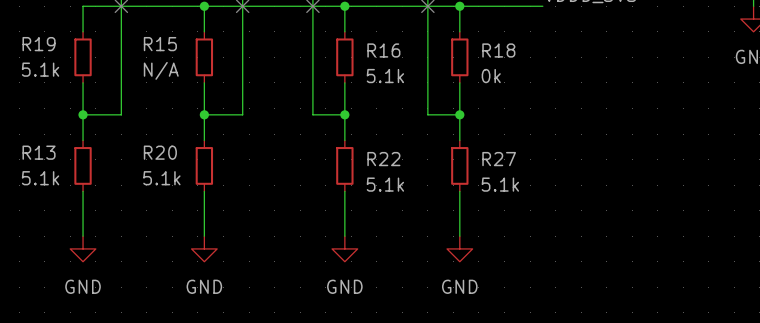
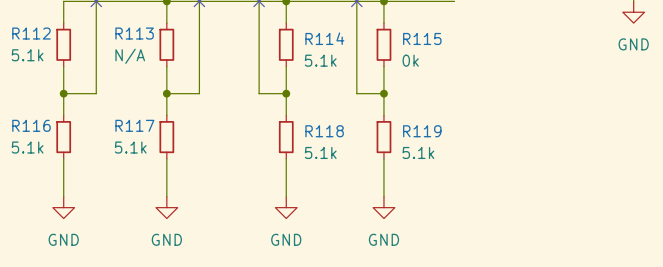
R19 name: R19 (39, 44) -> R112 (31, 33)
R15 name: R15 (160, 44) -> R113 (134, 33)
R16 name: R16 (383, 50) -> R114 (324, 38)
R18 name: R18 (498, 50) -> R115 (422, 38)
R13 name: R13 (39, 152) -> R116 (31, 125)
R20 name: R20 (160, 152) -> R117 (134, 125)
R22 name: R22 (383, 159) -> R118 (324, 131)
R27 name: R27 (499, 159) -> R119 (422, 131)

